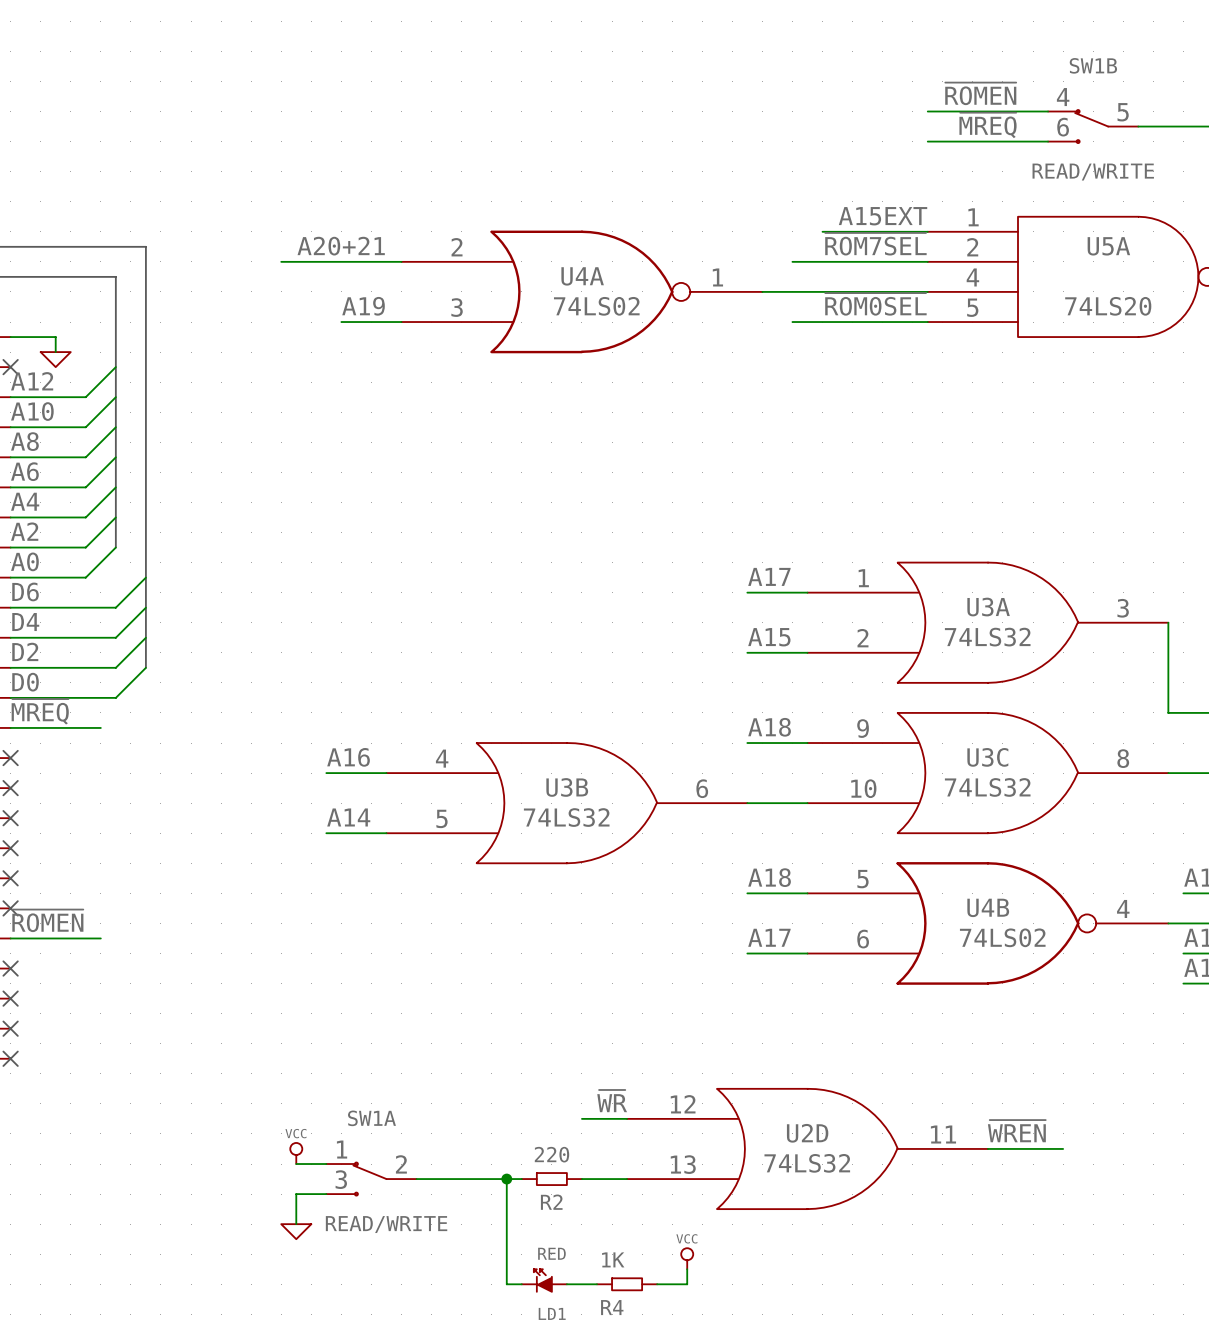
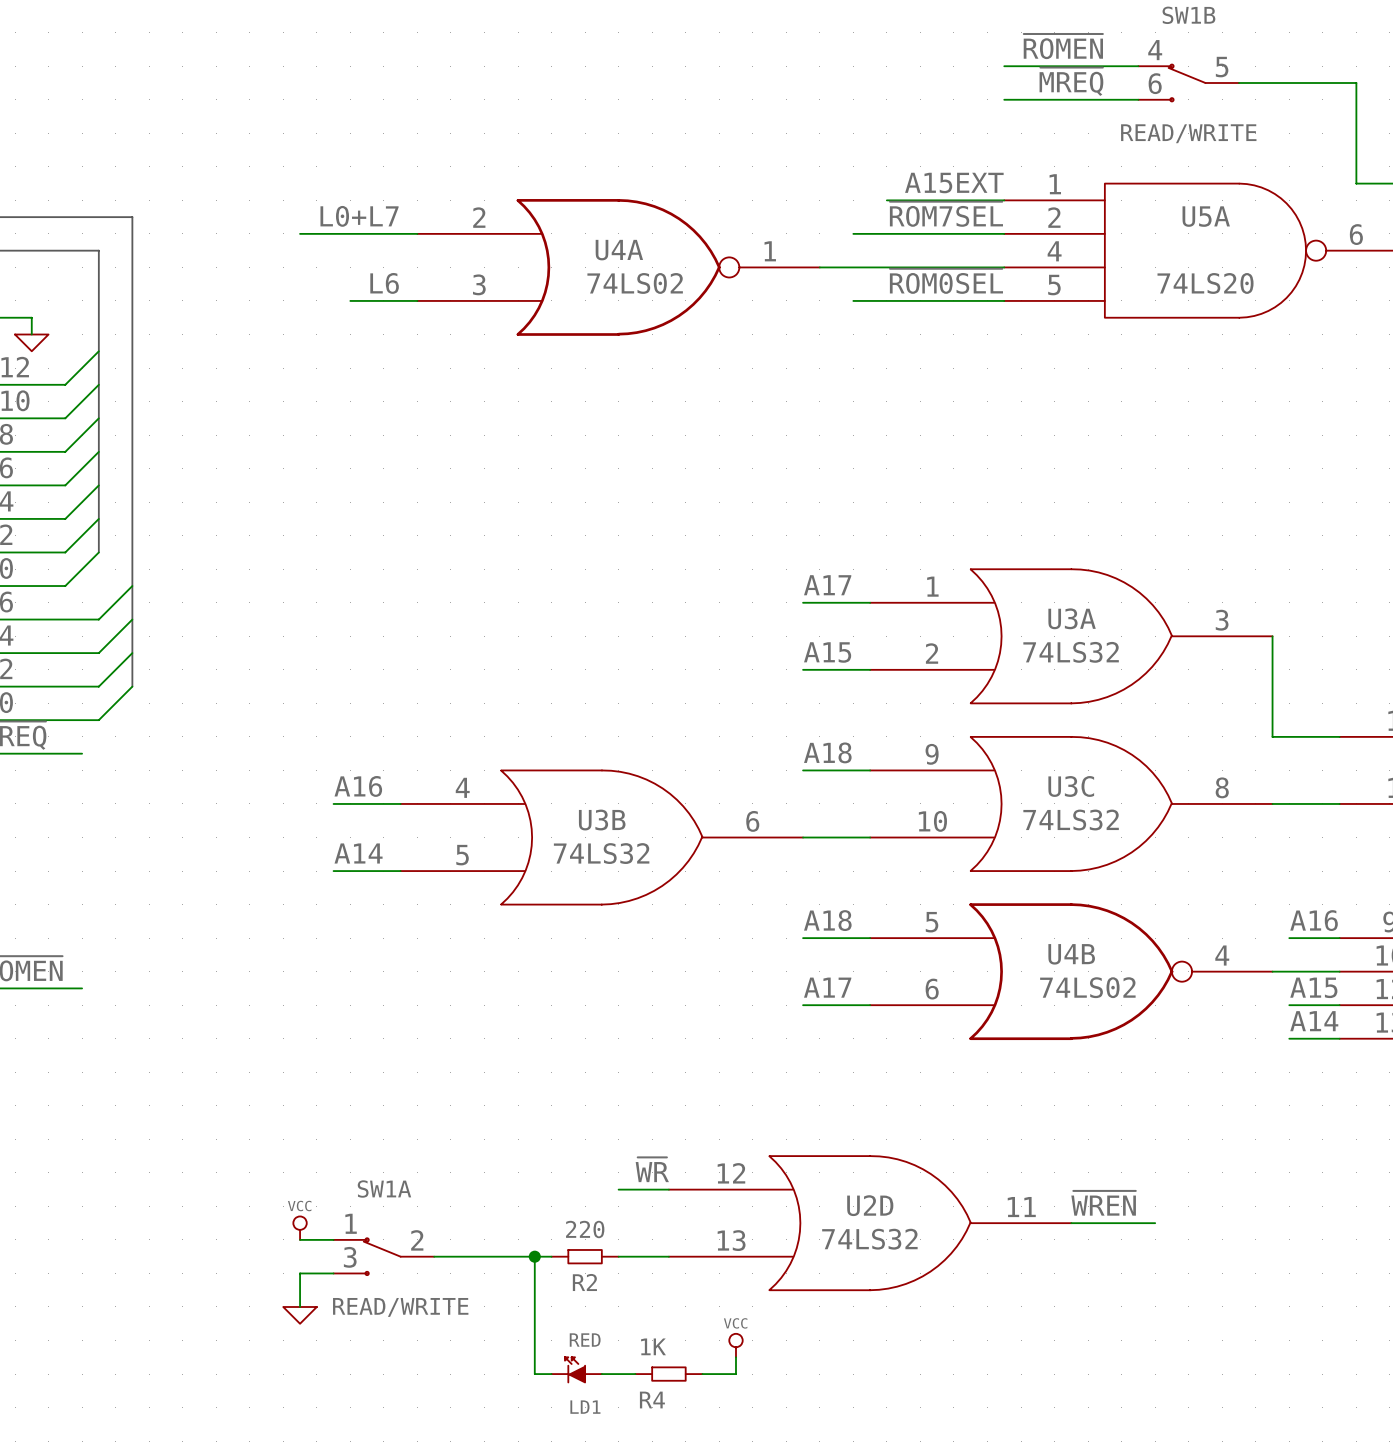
label: A20+21 (341, 246) -> L0+L7 (359, 216)
wire: (281, 261) (296, 261) -> none
label: A19 (363, 306) -> L6 (384, 283)

